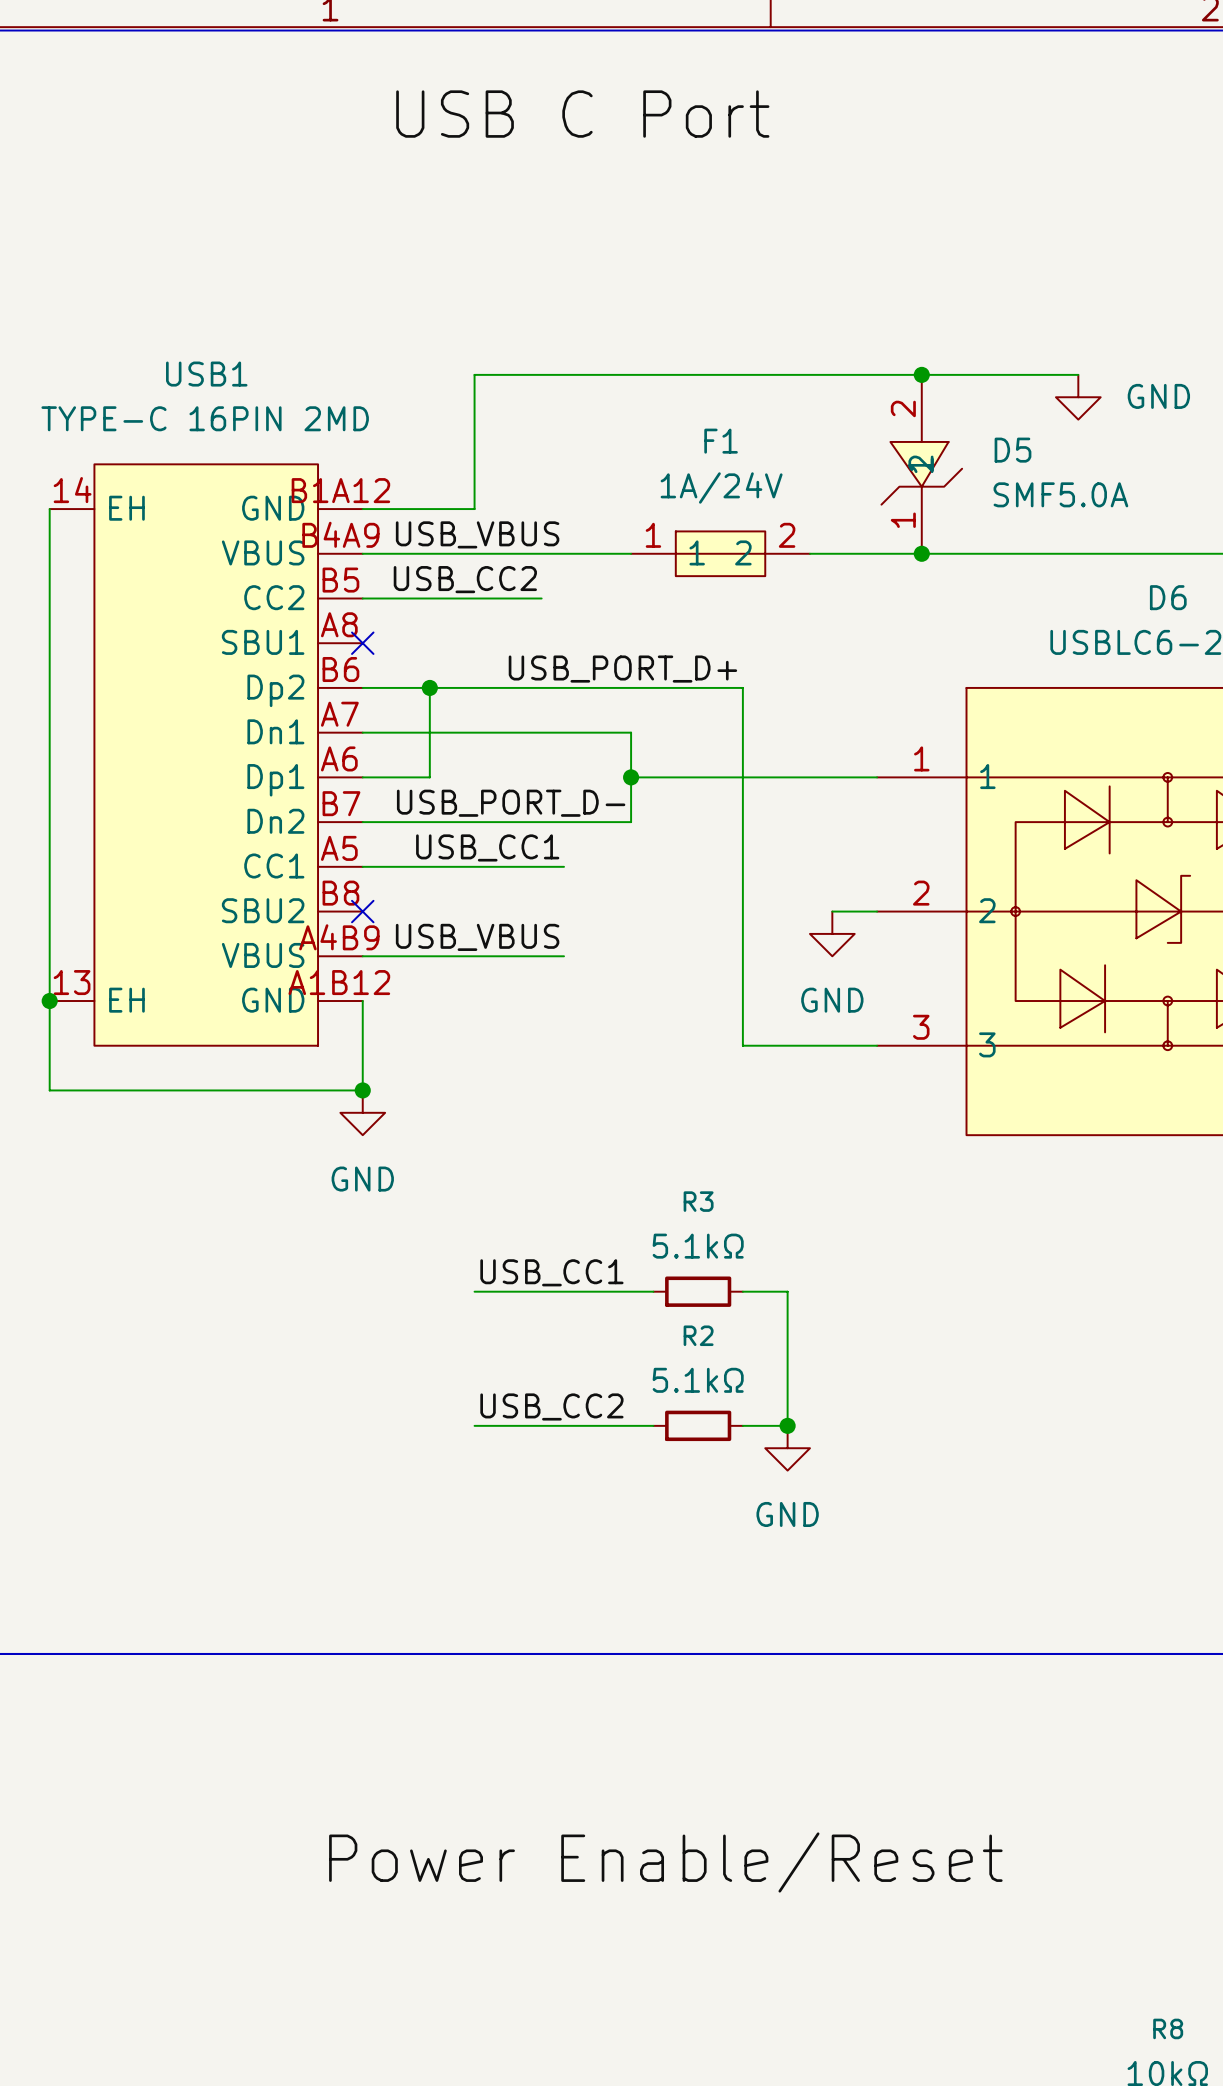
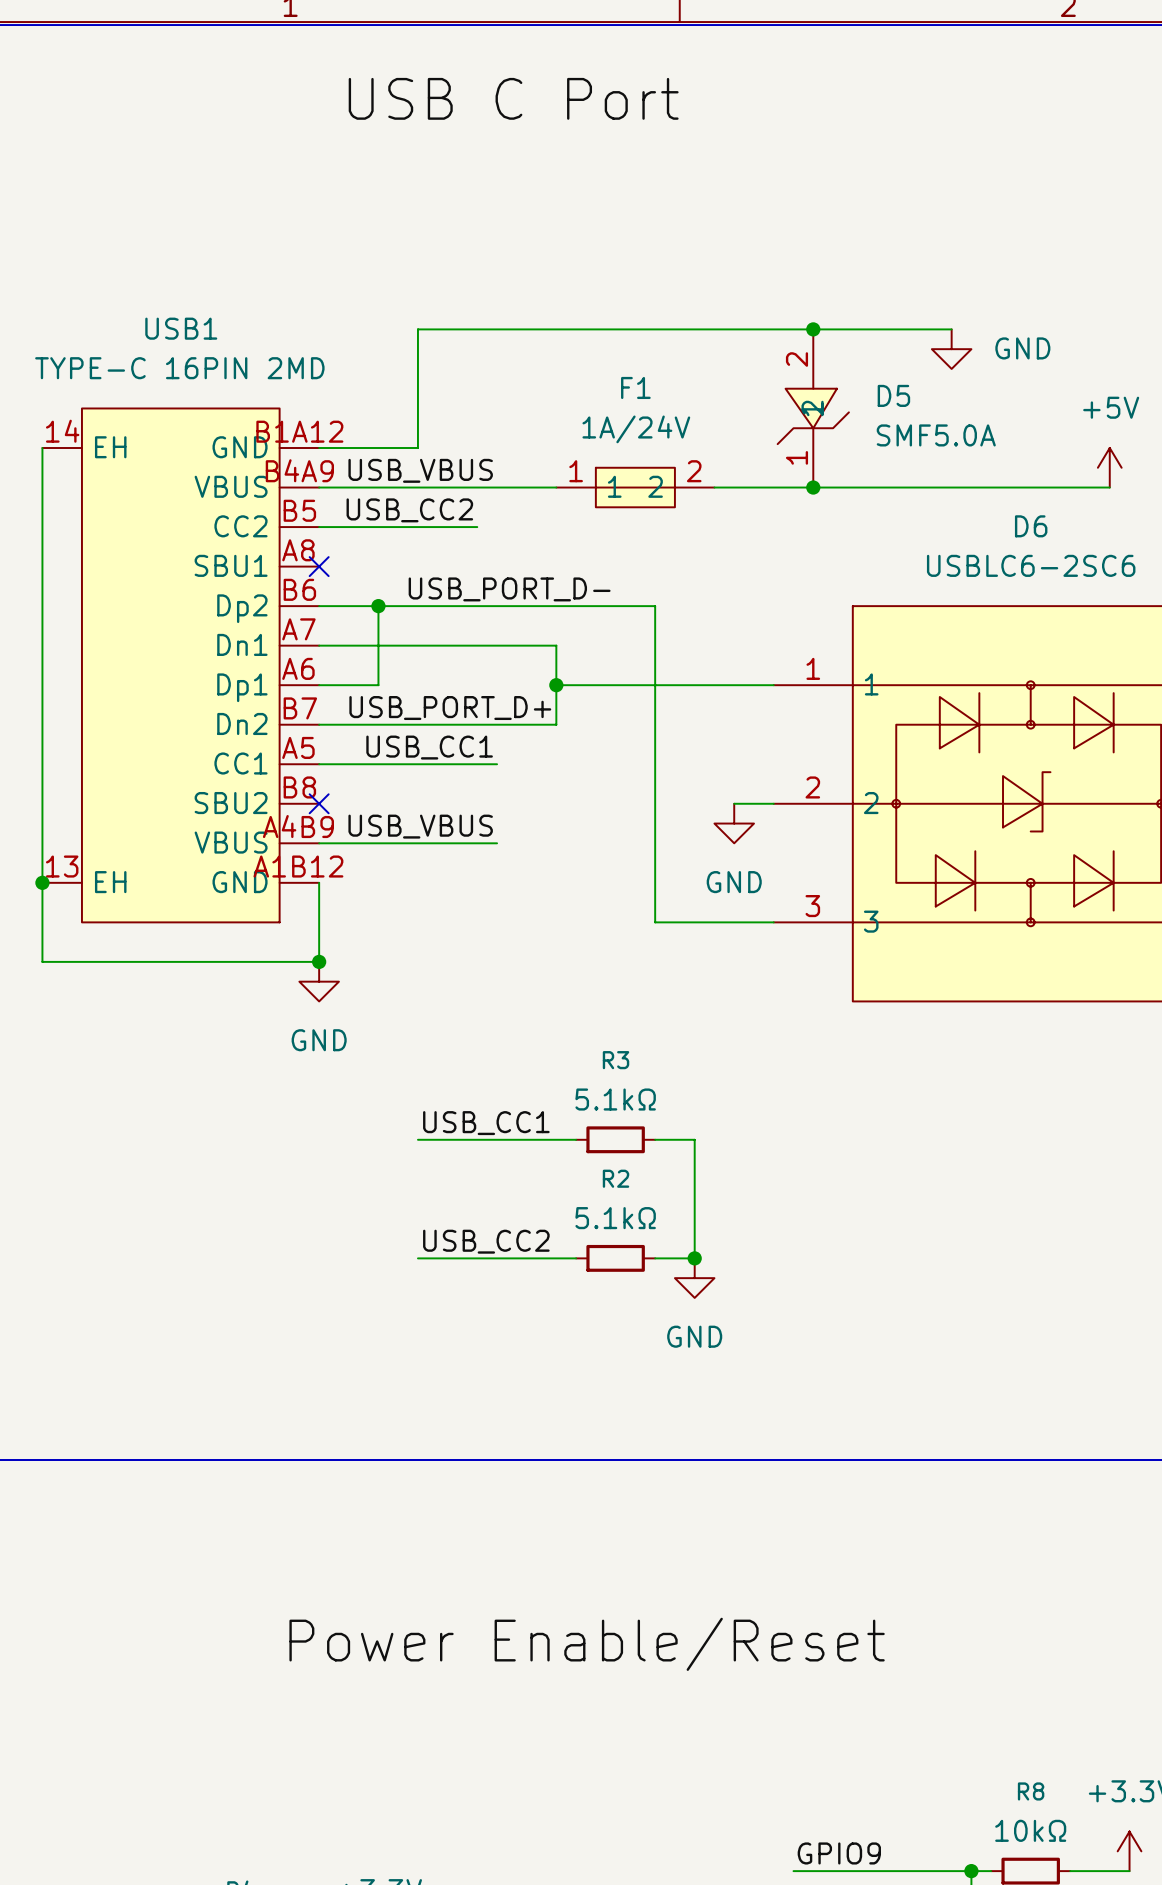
label: USB_PORT_D+ (622, 669) -> USB_PORT_D- (509, 589)
label: USB_PORT_D- (511, 803) -> USB_PORT_D+ (450, 708)

